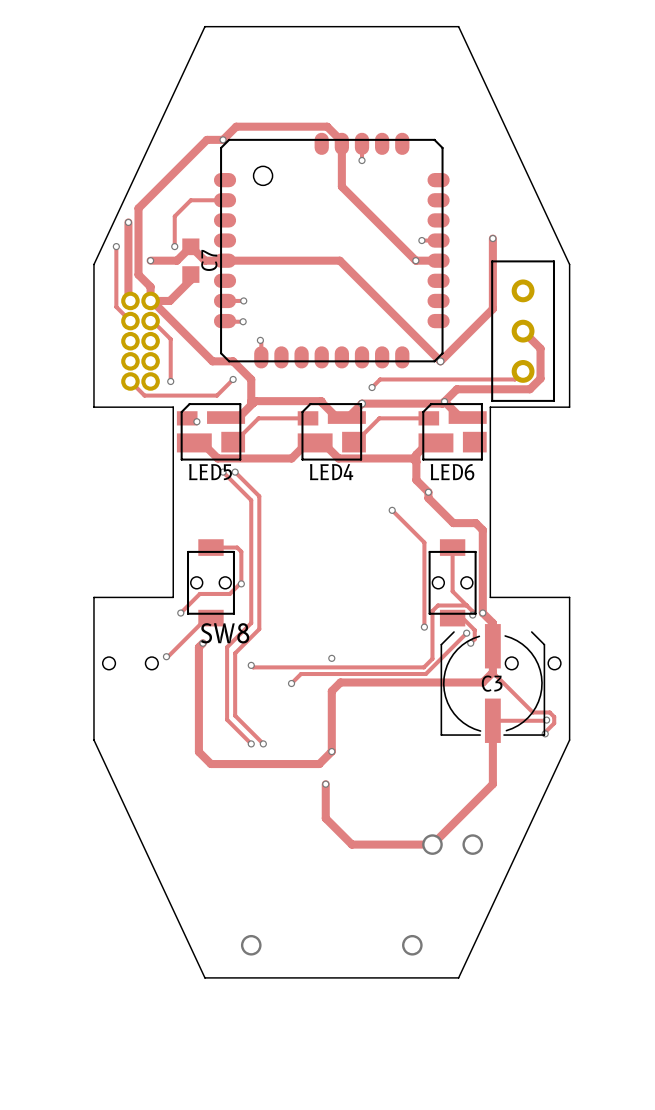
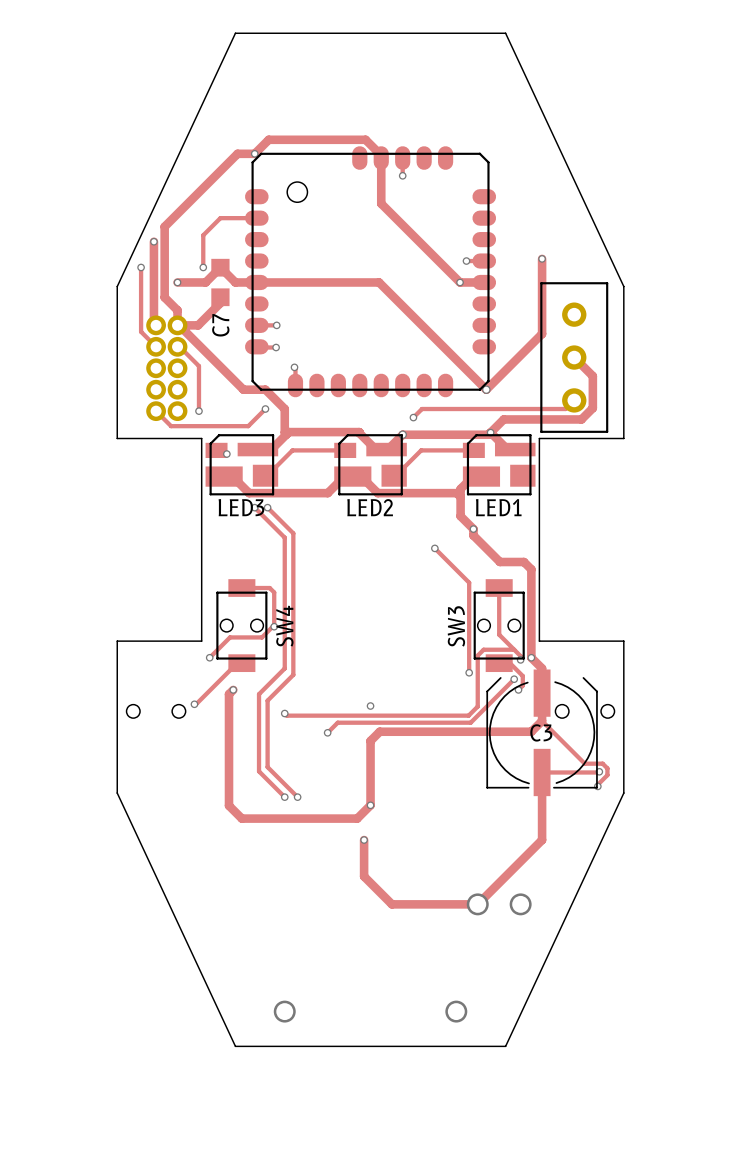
C7 name position: C7 (209, 260) -> C7 (220, 325)
LED5 name: LED5 (210, 472) -> LED3 (241, 507)
LED4 name: LED4 (331, 472) -> LED2 (370, 507)
LED6 name: LED6 (452, 472) -> LED1 (498, 507)
SW3 name: none -> SW3 (456, 626)
SW8 name: SW8 (225, 633) -> SW4 (284, 626)

